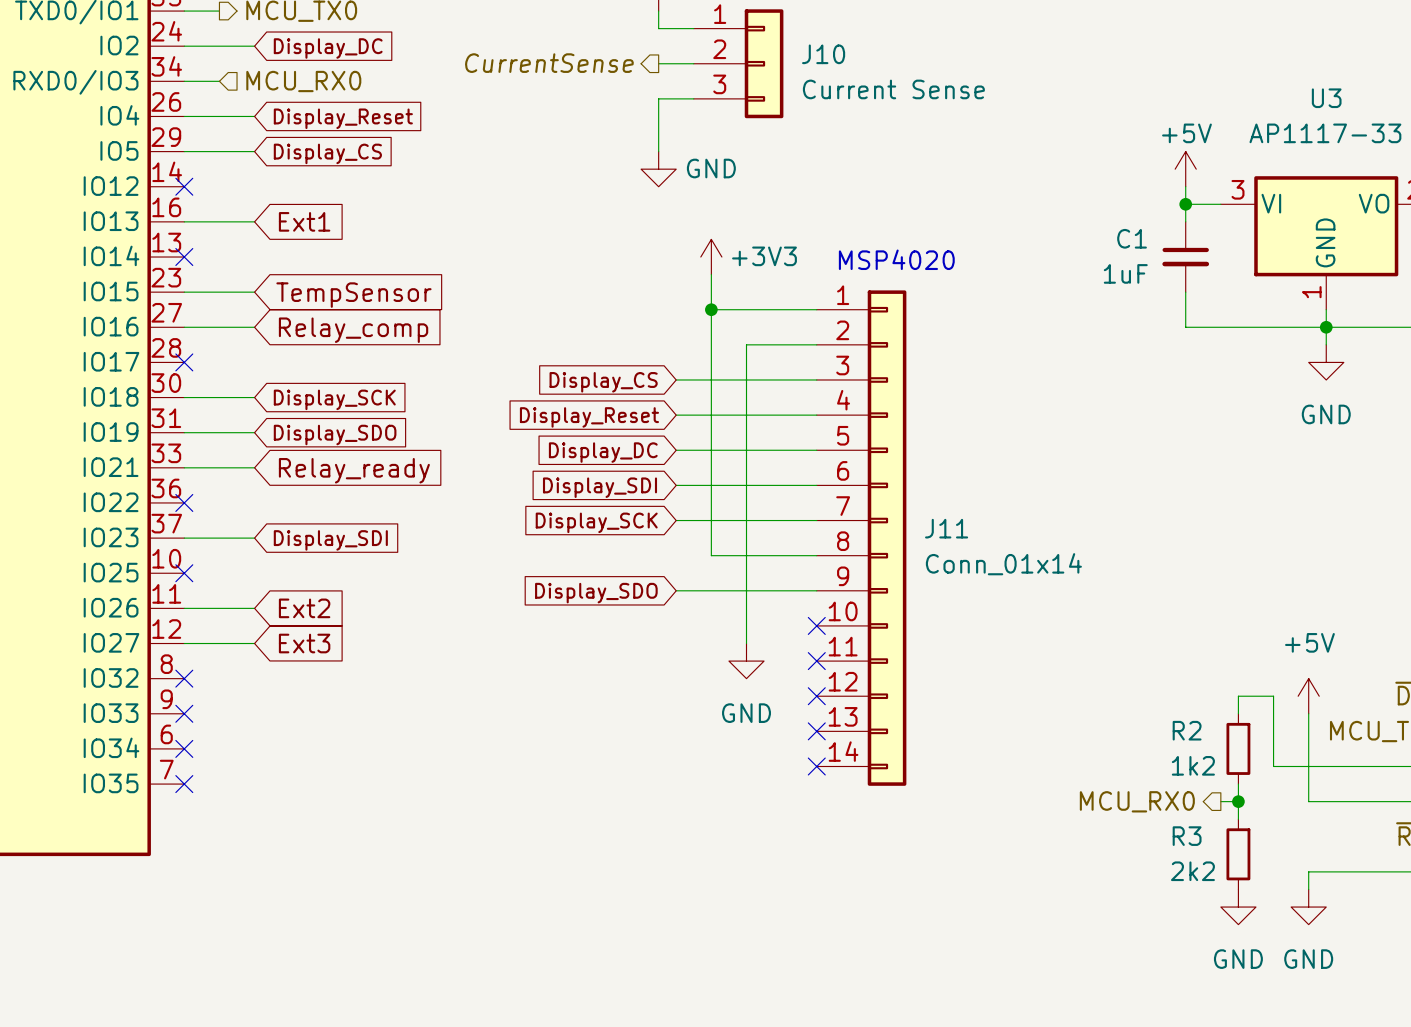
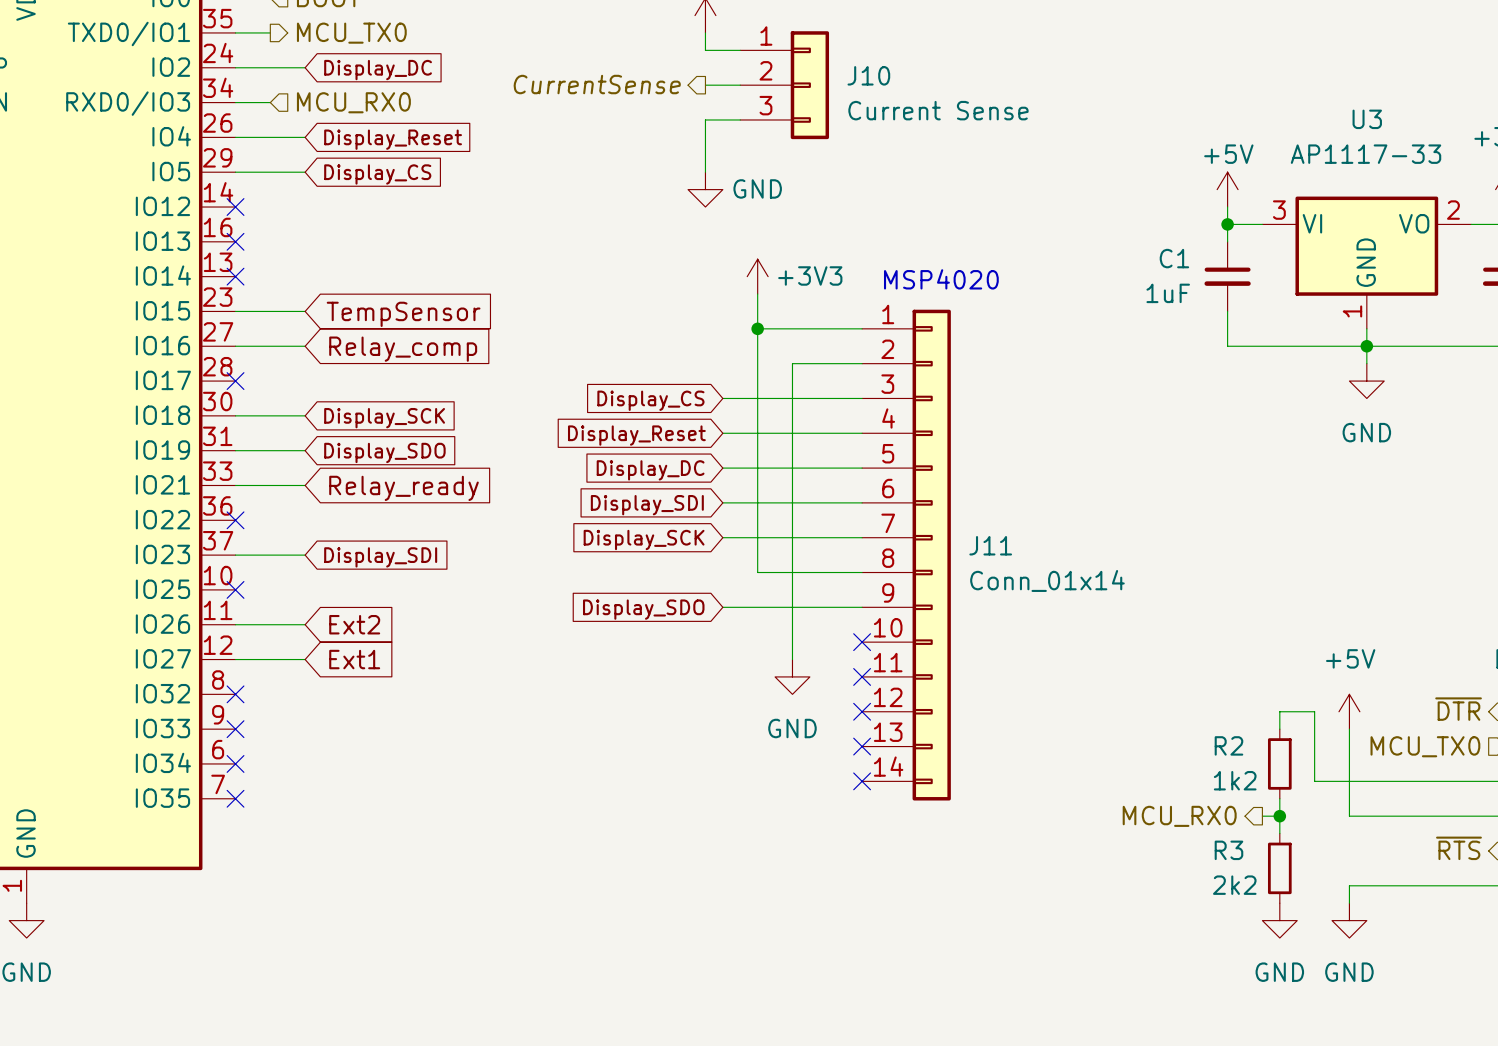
wire: (184, 221) (254, 221) -> none
no-connect mark: none -> (235, 241)
global label: Ext1 (304, 221) -> none
global label: Ext3 (304, 643) -> Ext1 (354, 659)

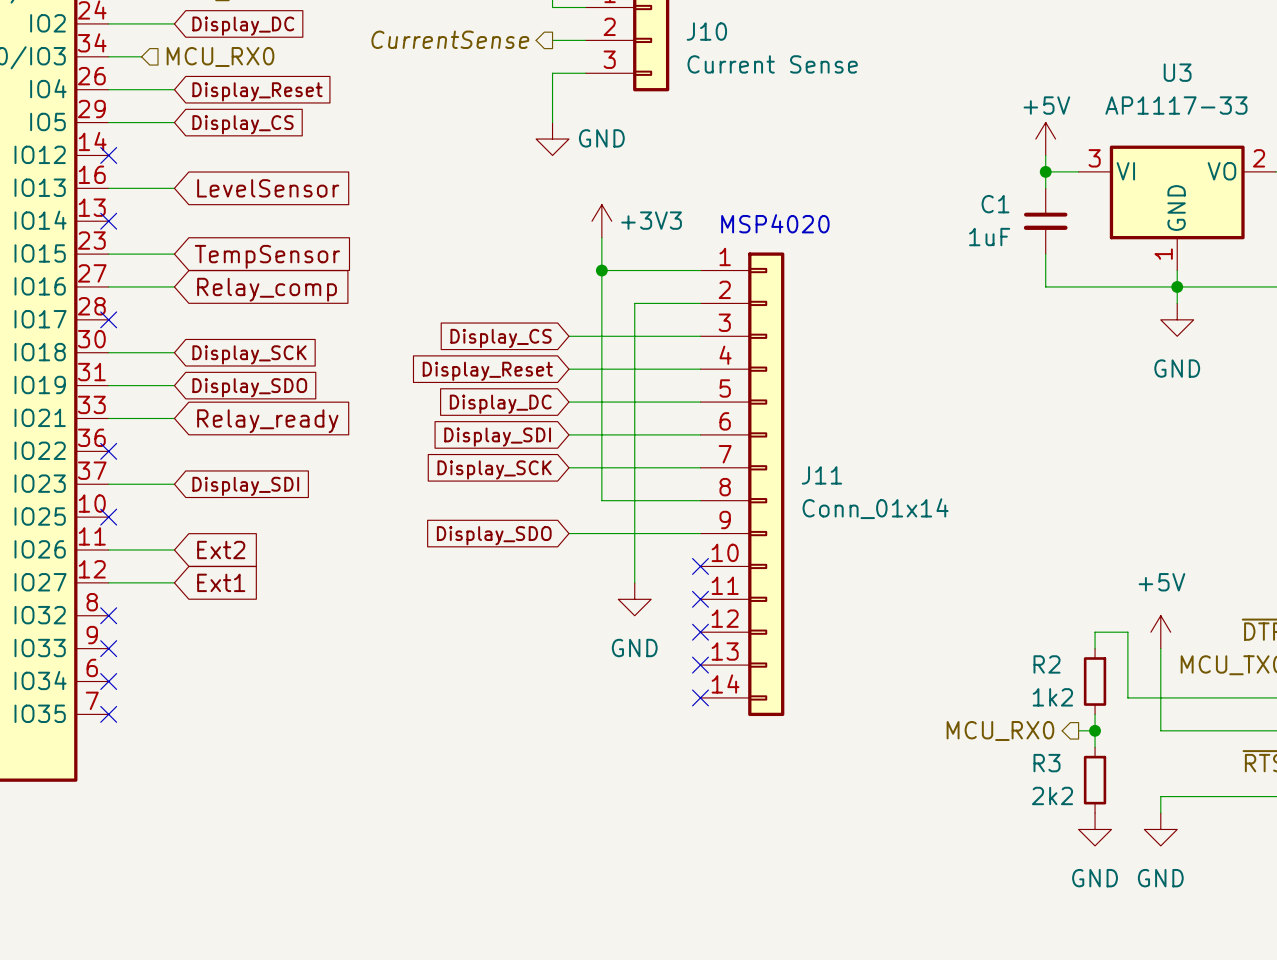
wire: none -> (108, 188) (174, 188)
no-connect mark: (235, 241) -> none
global label: none -> LevelSensor (268, 188)

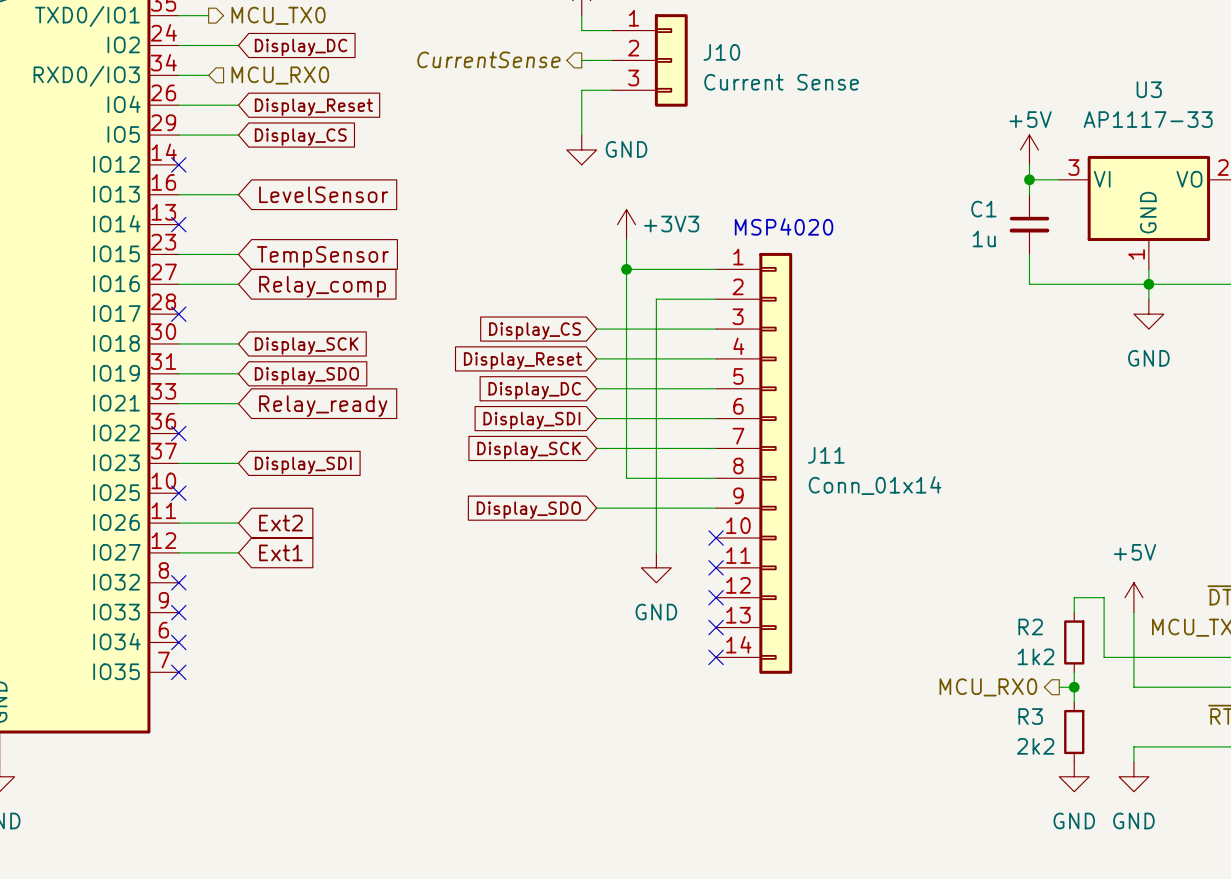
C1 value: 1uF (989, 237) -> 1u (984, 238)

